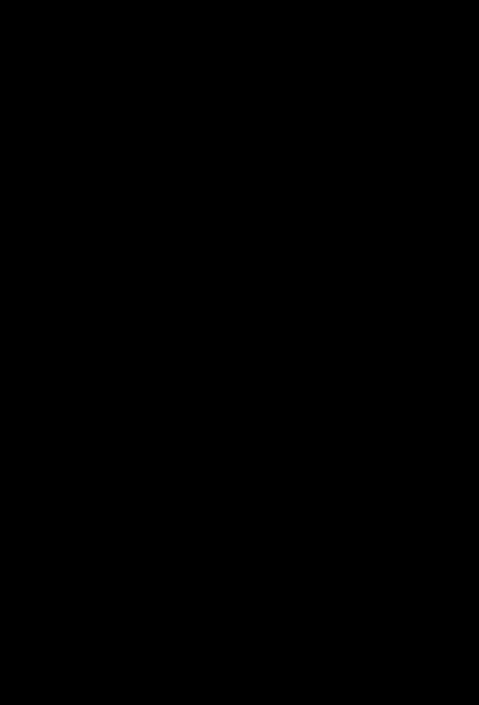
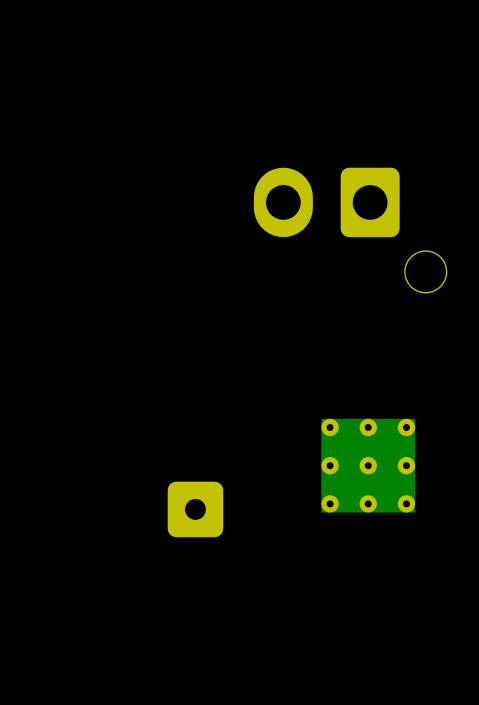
part: none -> (350, 230)
part: none -> (368, 465)
part: none -> (195, 509)

